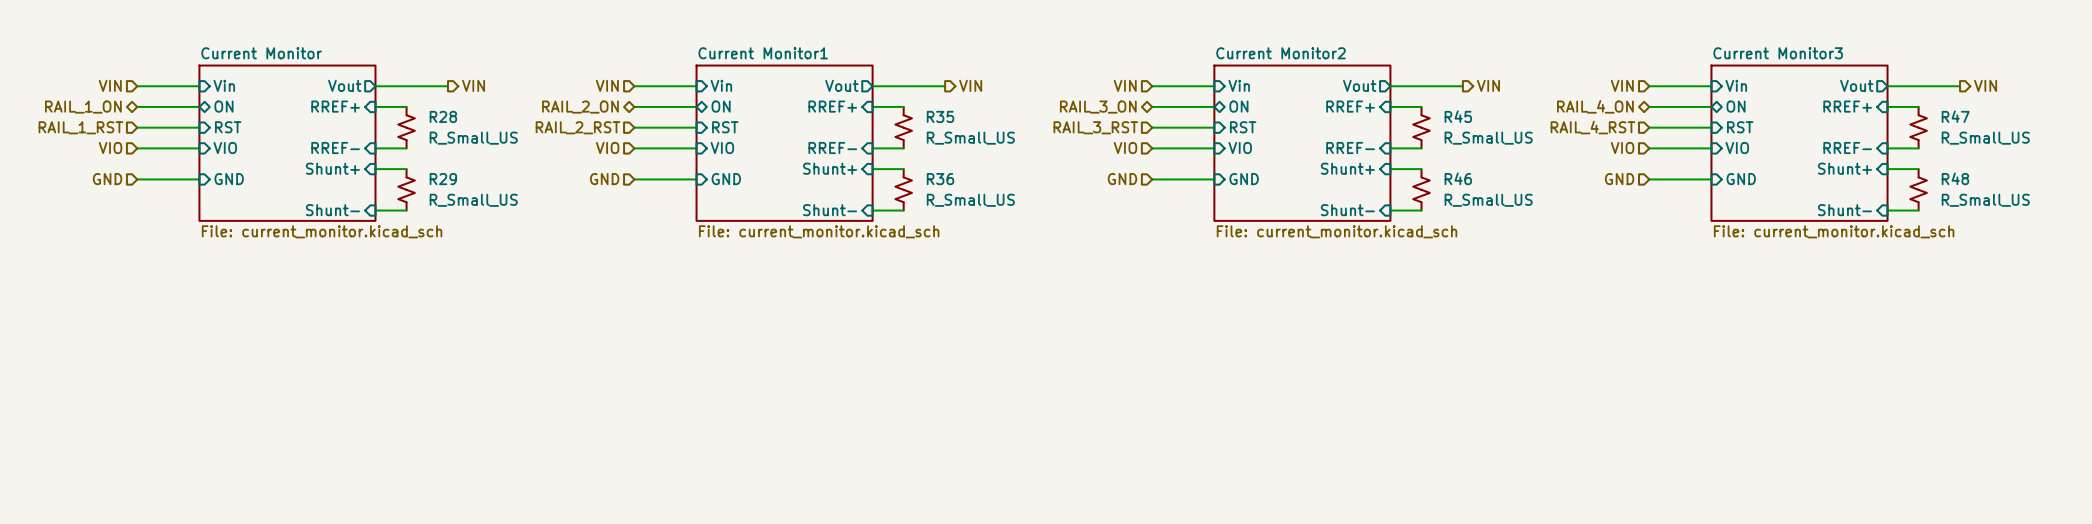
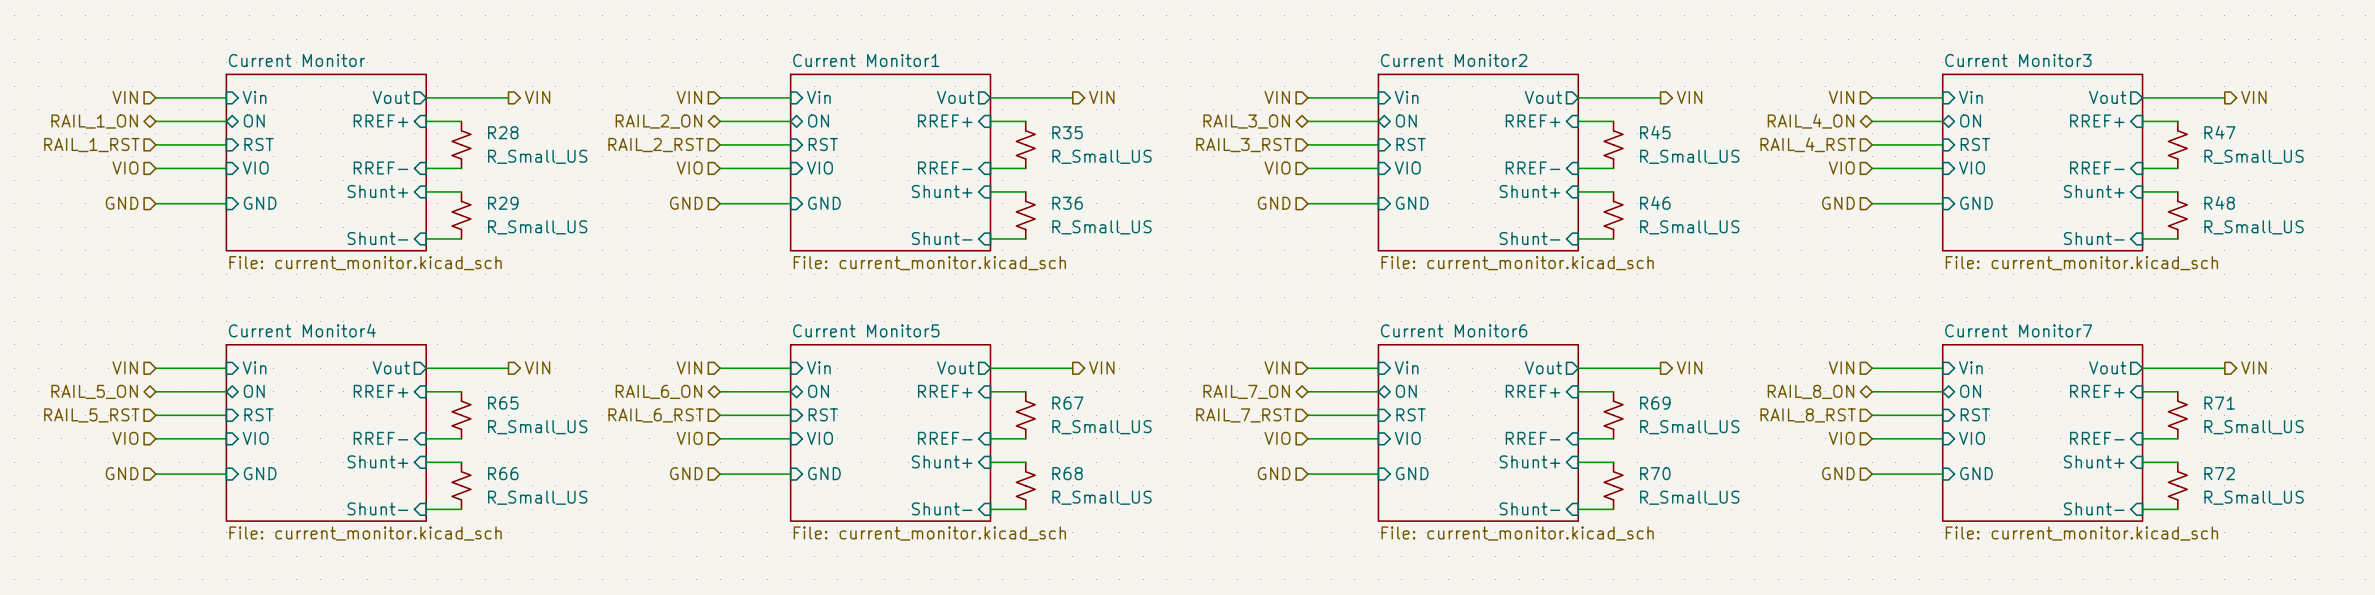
hierarchical label: none -> VIN (125, 367)
wire: none -> (155, 368) (226, 368)
sheet pin: none -> Vin (254, 367)
sheet pin: none -> Vout (391, 367)
wire: none -> (426, 368) (508, 368)
hierarchical label: none -> VIN (537, 367)
hierarchical label: none -> VIN (689, 367)
wire: none -> (720, 368) (790, 368)
sheet pin: none -> Vin (818, 367)
sheet pin: none -> Vout (955, 367)
wire: none -> (990, 368) (1072, 368)
hierarchical label: none -> VIN (1101, 367)
hierarchical label: none -> VIN (1277, 367)
wire: none -> (1307, 368) (1378, 368)
sheet pin: none -> Vin (1406, 367)
sheet pin: none -> Vout (1543, 367)
wire: none -> (1578, 368) (1660, 368)
hierarchical label: none -> VIN (1689, 367)
hierarchical label: none -> VIN (1841, 367)
wire: none -> (1872, 368) (1942, 368)
sheet pin: none -> Vin (1970, 367)
sheet pin: none -> Vout (2107, 367)
wire: none -> (2142, 368) (2224, 368)
hierarchical label: none -> VIN (2253, 367)
sheet pin: none -> ON (254, 391)
sheet pin: none -> RREF+ (380, 391)
sheet pin: none -> ON (818, 391)
sheet pin: none -> RREF+ (945, 391)
sheet pin: none -> ON (1406, 391)
sheet pin: none -> RREF+ (1533, 391)
sheet pin: none -> ON (1970, 391)
sheet pin: none -> RREF+ (2097, 391)
hierarchical label: none -> RAIL_5_ON (94, 391)
wire: none -> (155, 391) (226, 391)
wire: none -> (426, 391) (461, 391)
hierarchical label: none -> RAIL_6_ON (658, 391)
wire: none -> (720, 391) (790, 391)
wire: none -> (990, 391) (1025, 391)
hierarchical label: none -> RAIL_7_ON (1246, 391)
wire: none -> (1307, 391) (1378, 391)
wire: none -> (1578, 391) (1613, 391)
hierarchical label: none -> RAIL_8_ON (1810, 391)
wire: none -> (1872, 391) (1942, 391)
wire: none -> (2142, 391) (2177, 391)
hierarchical label: none -> RAIL_5_RST (91, 415)
wire: none -> (155, 415) (226, 415)
sheet pin: none -> RST (259, 414)
R65: none -> R_Small_US (461, 415)
hierarchical label: none -> RAIL_6_RST (656, 415)
wire: none -> (720, 415) (790, 415)
sheet pin: none -> RST (823, 414)
R67: none -> R_Small_US (1025, 415)
hierarchical label: none -> RAIL_7_RST (1243, 415)
wire: none -> (1307, 415) (1378, 415)
sheet pin: none -> RST (1411, 414)
R69: none -> R_Small_US (1613, 415)
hierarchical label: none -> RAIL_8_RST (1808, 415)
wire: none -> (1872, 415) (1942, 415)
sheet pin: none -> RST (1975, 414)
R71: none -> R_Small_US (2177, 415)
sheet Current Monitor4: none -> File: current_monitor.kicad_sch (326, 432)
sheet Current Monitor5: none -> File: current_monitor.kicad_sch (890, 432)
sheet Current Monitor6: none -> File: current_monitor.kicad_sch (1478, 432)
sheet Current Monitor7: none -> File: current_monitor.kicad_sch (2042, 432)
hierarchical label: none -> VIO (125, 438)
wire: none -> (155, 438) (226, 438)
sheet pin: none -> VIO (255, 438)
sheet pin: none -> RREF- (380, 438)
wire: none -> (426, 438) (461, 438)
hierarchical label: none -> VIO (689, 438)
wire: none -> (720, 438) (790, 438)
sheet pin: none -> VIO (819, 438)
sheet pin: none -> RREF- (945, 438)
wire: none -> (990, 438) (1025, 438)
hierarchical label: none -> VIO (1277, 438)
wire: none -> (1307, 438) (1378, 438)
sheet pin: none -> VIO (1407, 438)
sheet pin: none -> RREF- (1533, 438)
wire: none -> (1578, 438) (1613, 438)
hierarchical label: none -> VIO (1841, 438)
wire: none -> (1872, 438) (1942, 438)
sheet pin: none -> VIO (1972, 438)
sheet pin: none -> RREF- (2097, 438)
wire: none -> (2142, 438) (2177, 438)
sheet pin: none -> Shunt+ (377, 461)
sheet pin: none -> Shunt+ (942, 461)
sheet pin: none -> Shunt+ (1529, 461)
sheet pin: none -> Shunt+ (2094, 461)
wire: none -> (426, 462) (461, 462)
wire: none -> (990, 462) (1025, 462)
wire: none -> (1578, 462) (1613, 462)
wire: none -> (2142, 462) (2177, 462)
hierarchical label: none -> GND (122, 473)
wire: none -> (155, 474) (226, 474)
sheet pin: none -> GND (260, 473)
hierarchical label: none -> GND (686, 473)
wire: none -> (720, 474) (790, 474)
sheet pin: none -> GND (824, 473)
hierarchical label: none -> GND (1274, 473)
wire: none -> (1307, 474) (1378, 474)
sheet pin: none -> GND (1412, 473)
hierarchical label: none -> GND (1838, 473)
wire: none -> (1872, 474) (1942, 474)
sheet pin: none -> GND (1976, 473)
R66: none -> R_Small_US (461, 485)
R68: none -> R_Small_US (1025, 485)
R70: none -> R_Small_US (1613, 485)
R72: none -> R_Small_US (2177, 485)
sheet pin: none -> Shunt- (377, 508)
wire: none -> (426, 509) (461, 509)
sheet pin: none -> Shunt- (942, 508)
wire: none -> (990, 509) (1025, 509)
sheet pin: none -> Shunt- (1529, 508)
wire: none -> (1578, 509) (1613, 509)
sheet pin: none -> Shunt- (2094, 508)
wire: none -> (2142, 509) (2177, 509)

